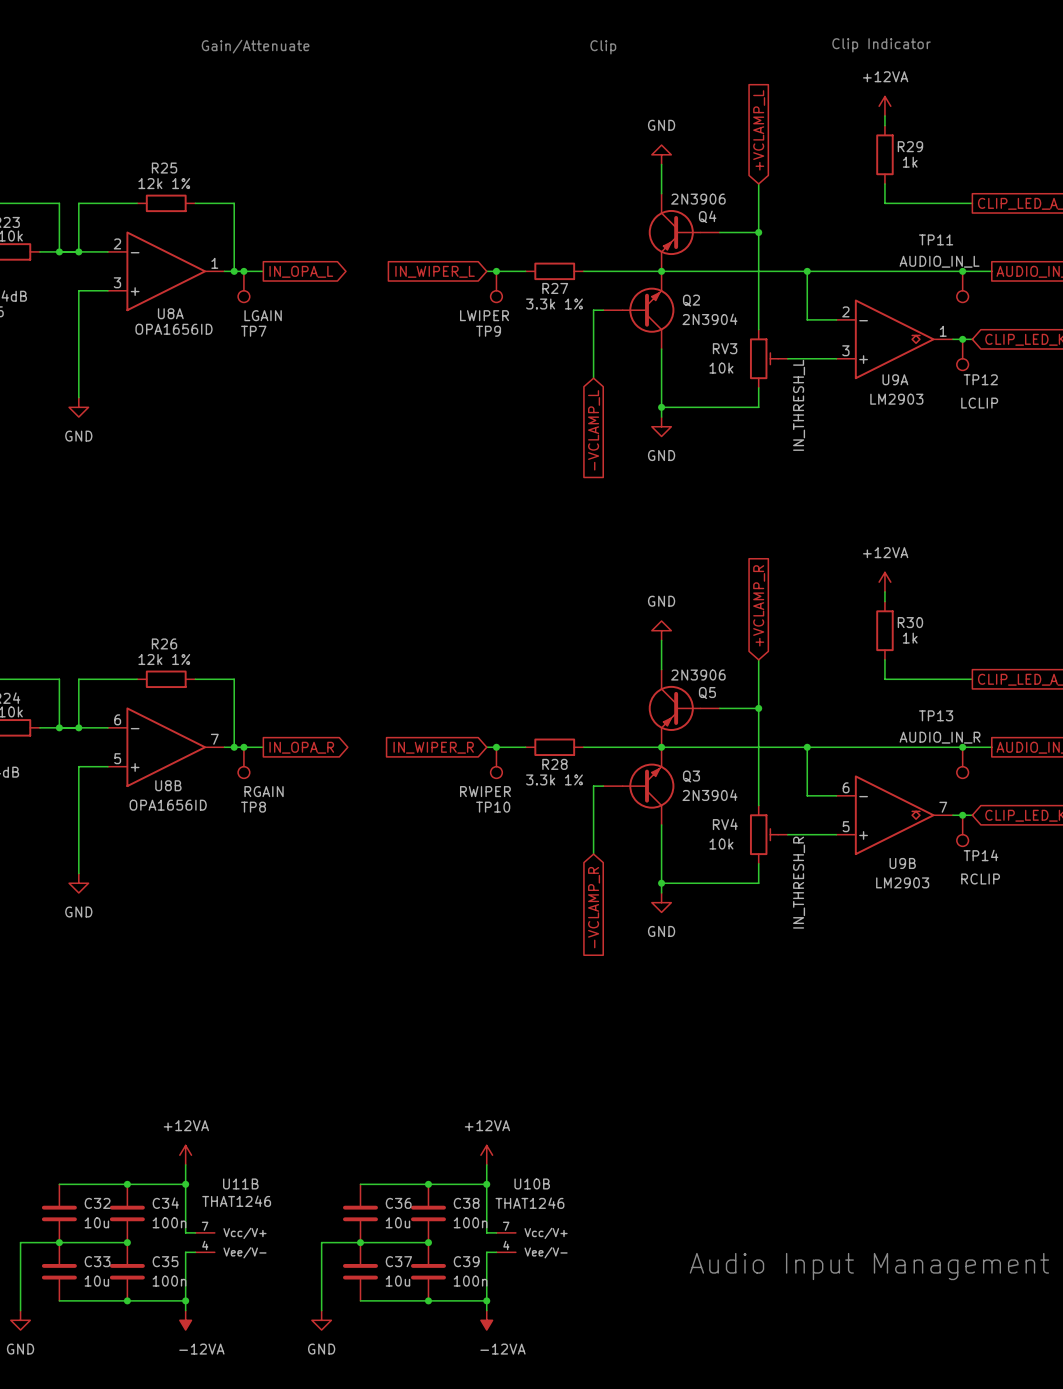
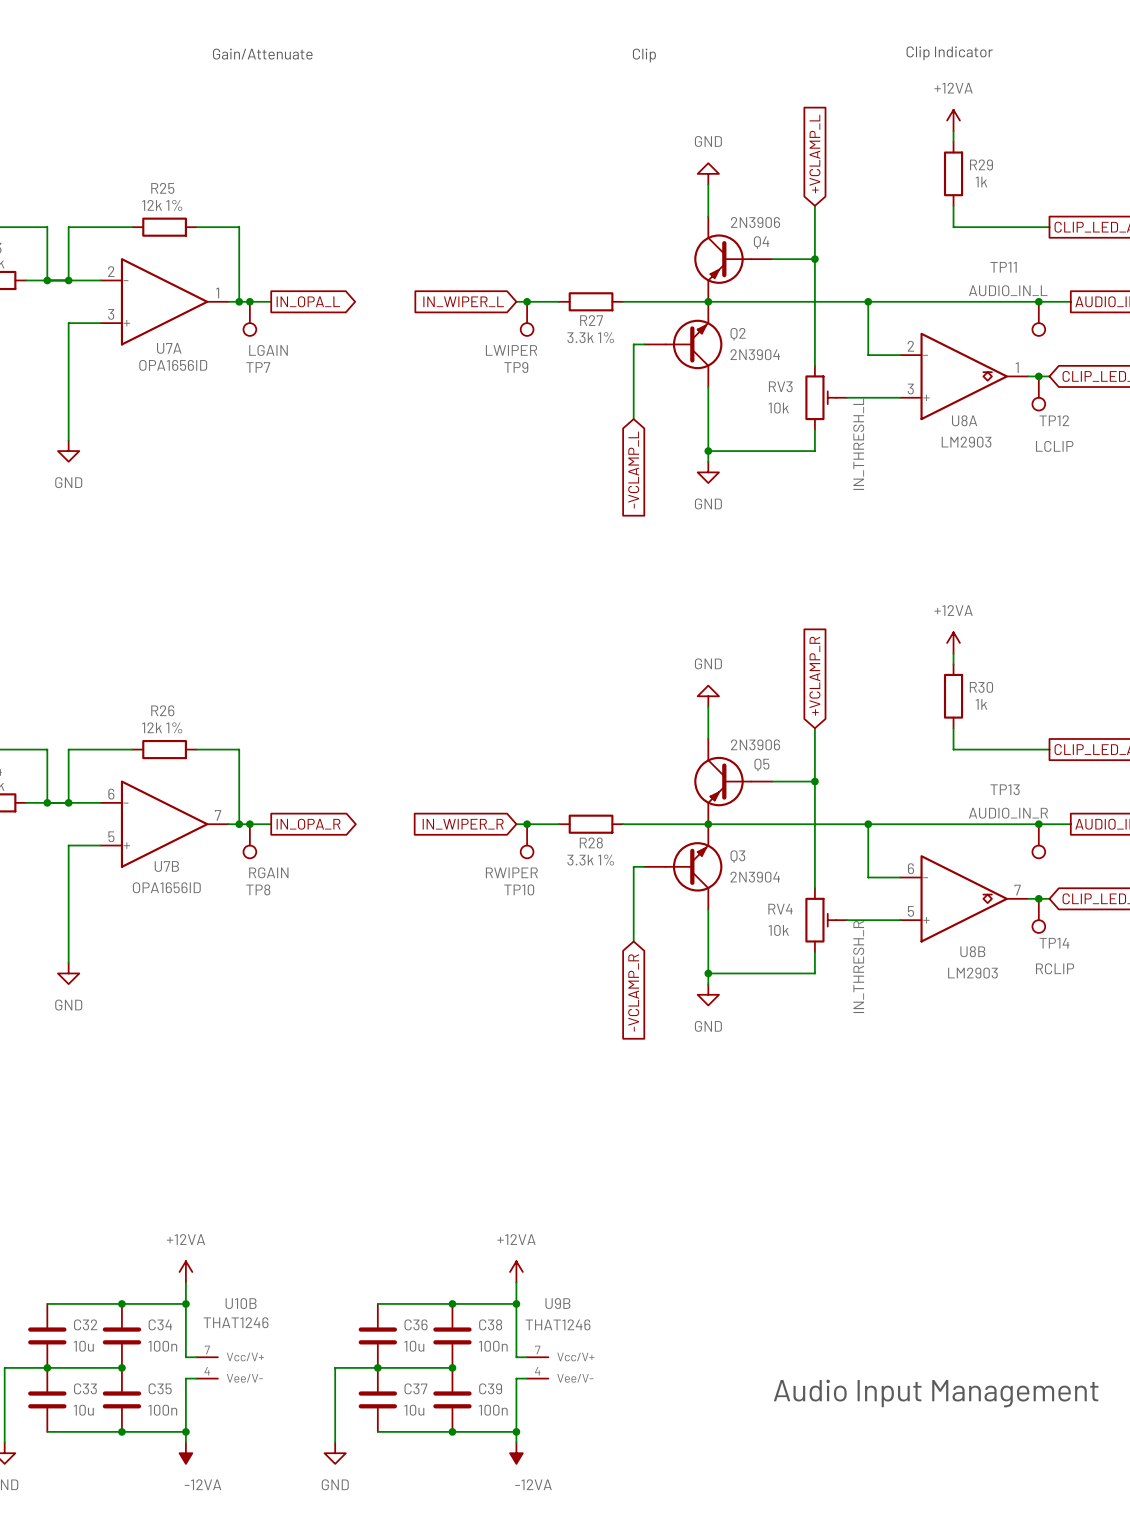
U8A name: U8A (170, 313) -> U7A (169, 348)
U9A name: U9A (895, 379) -> U8A (964, 420)
U8B name: U8B (168, 785) -> U7B (166, 866)
U9B name: U9B (902, 863) -> U8B (972, 951)
U11B name: U11B (240, 1183) -> U10B (241, 1303)
U10B name: U10B (532, 1183) -> U9B (557, 1303)

